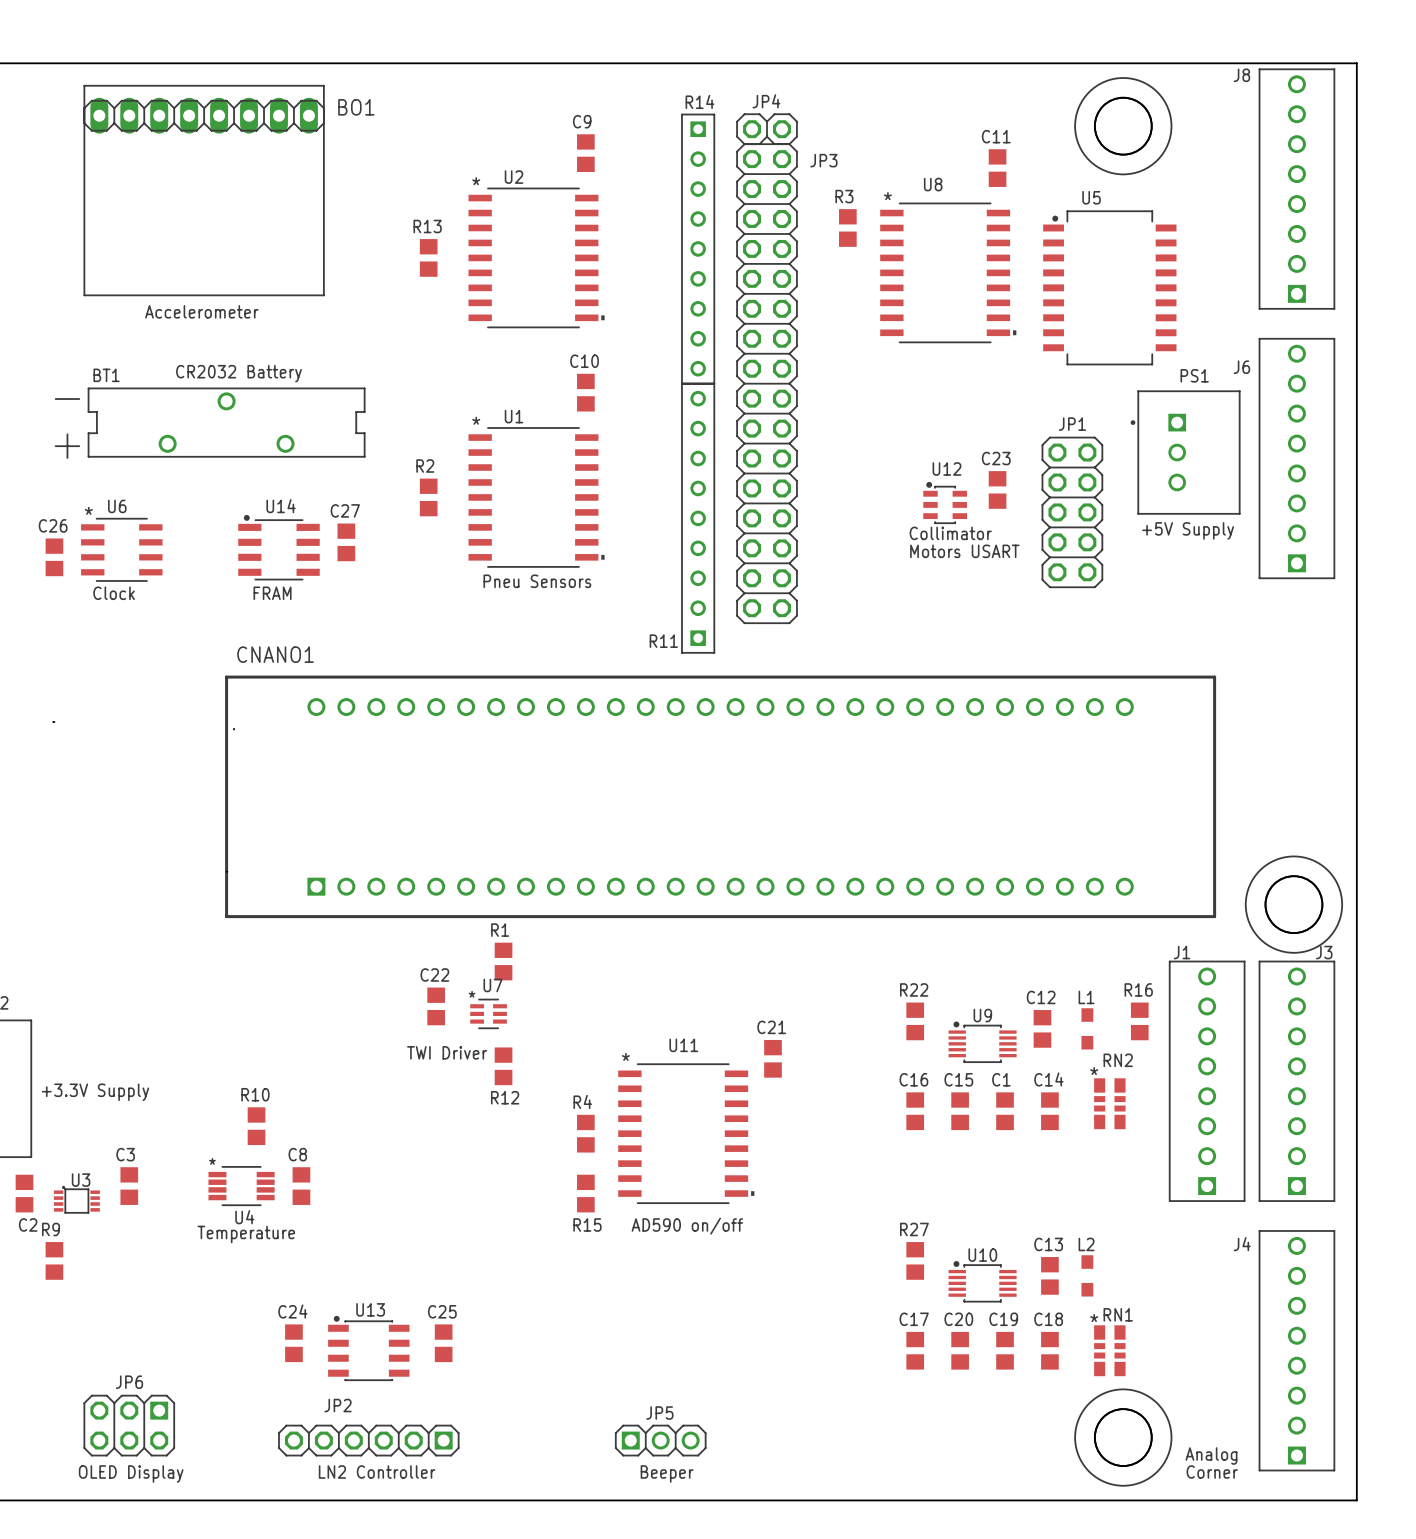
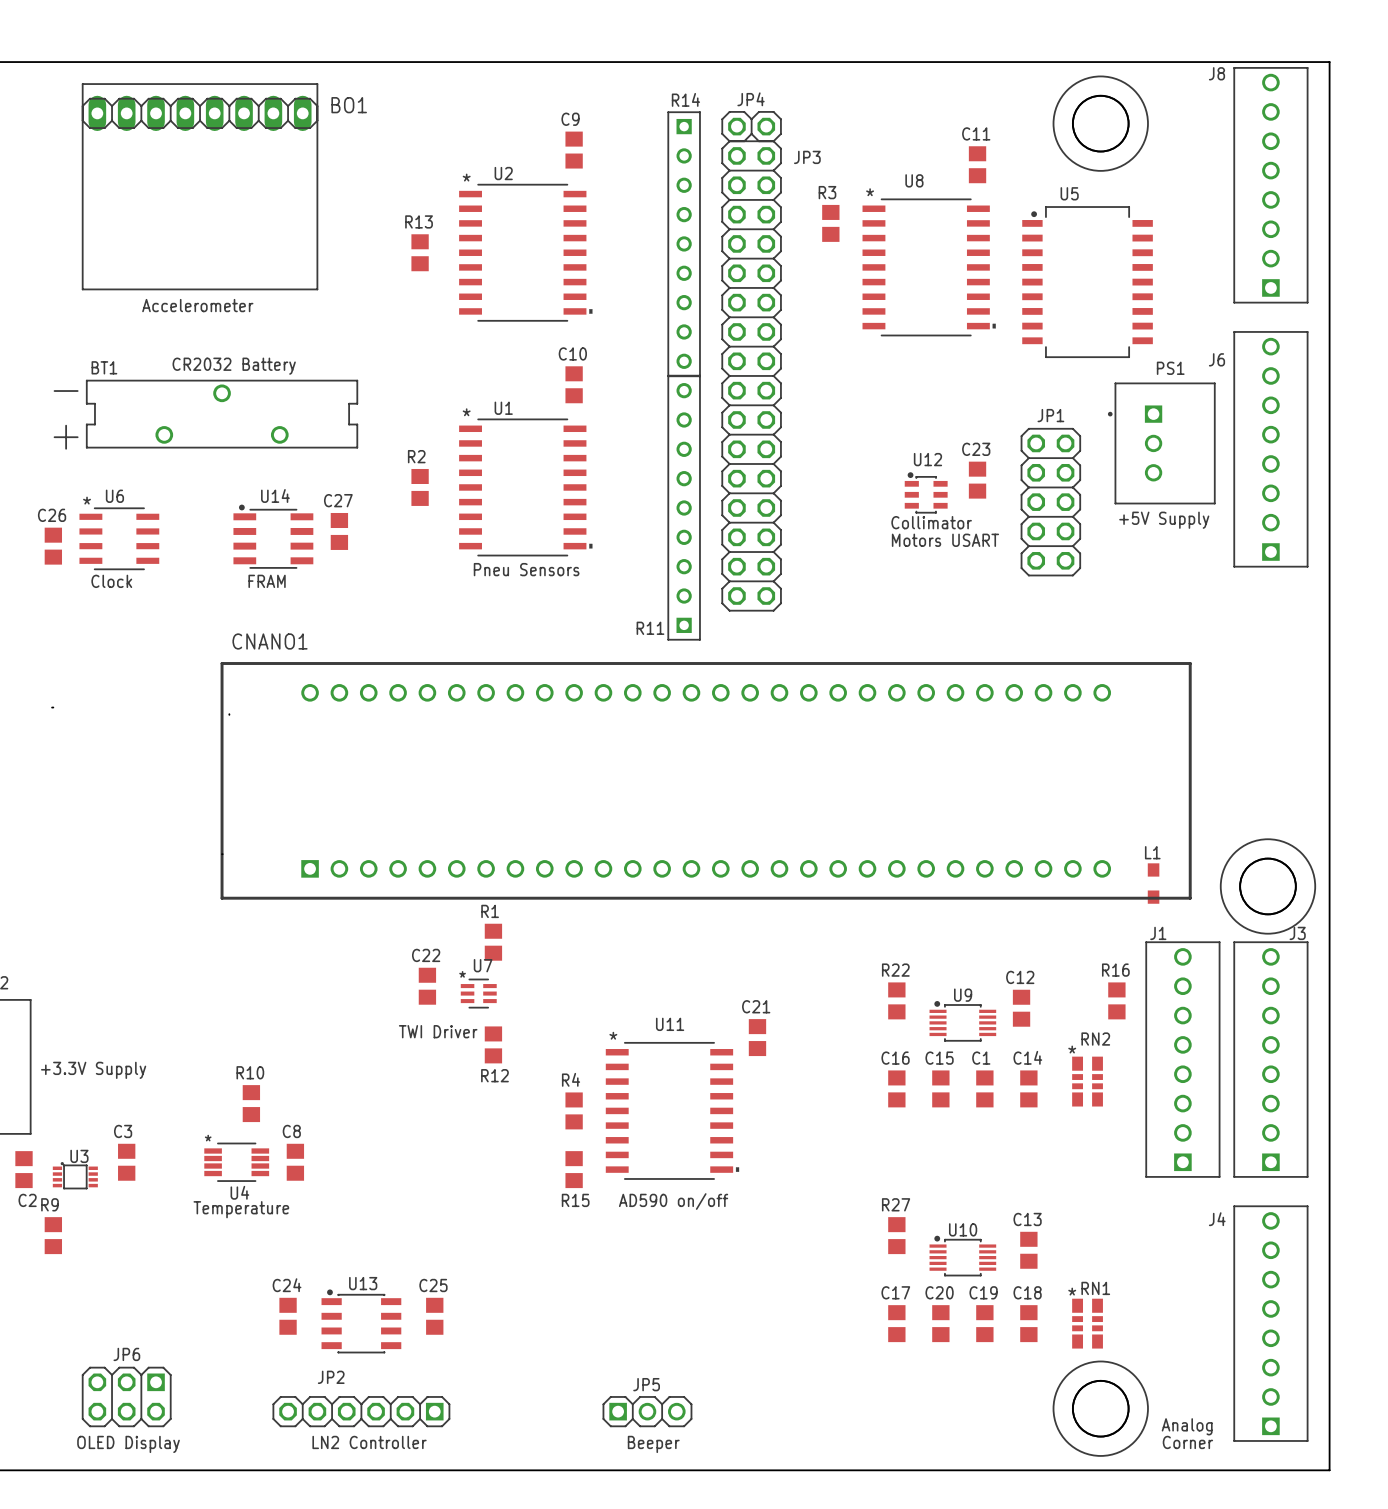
L1 position: (1087, 1028) -> (1153, 883)
L2: (1087, 1275) -> none

